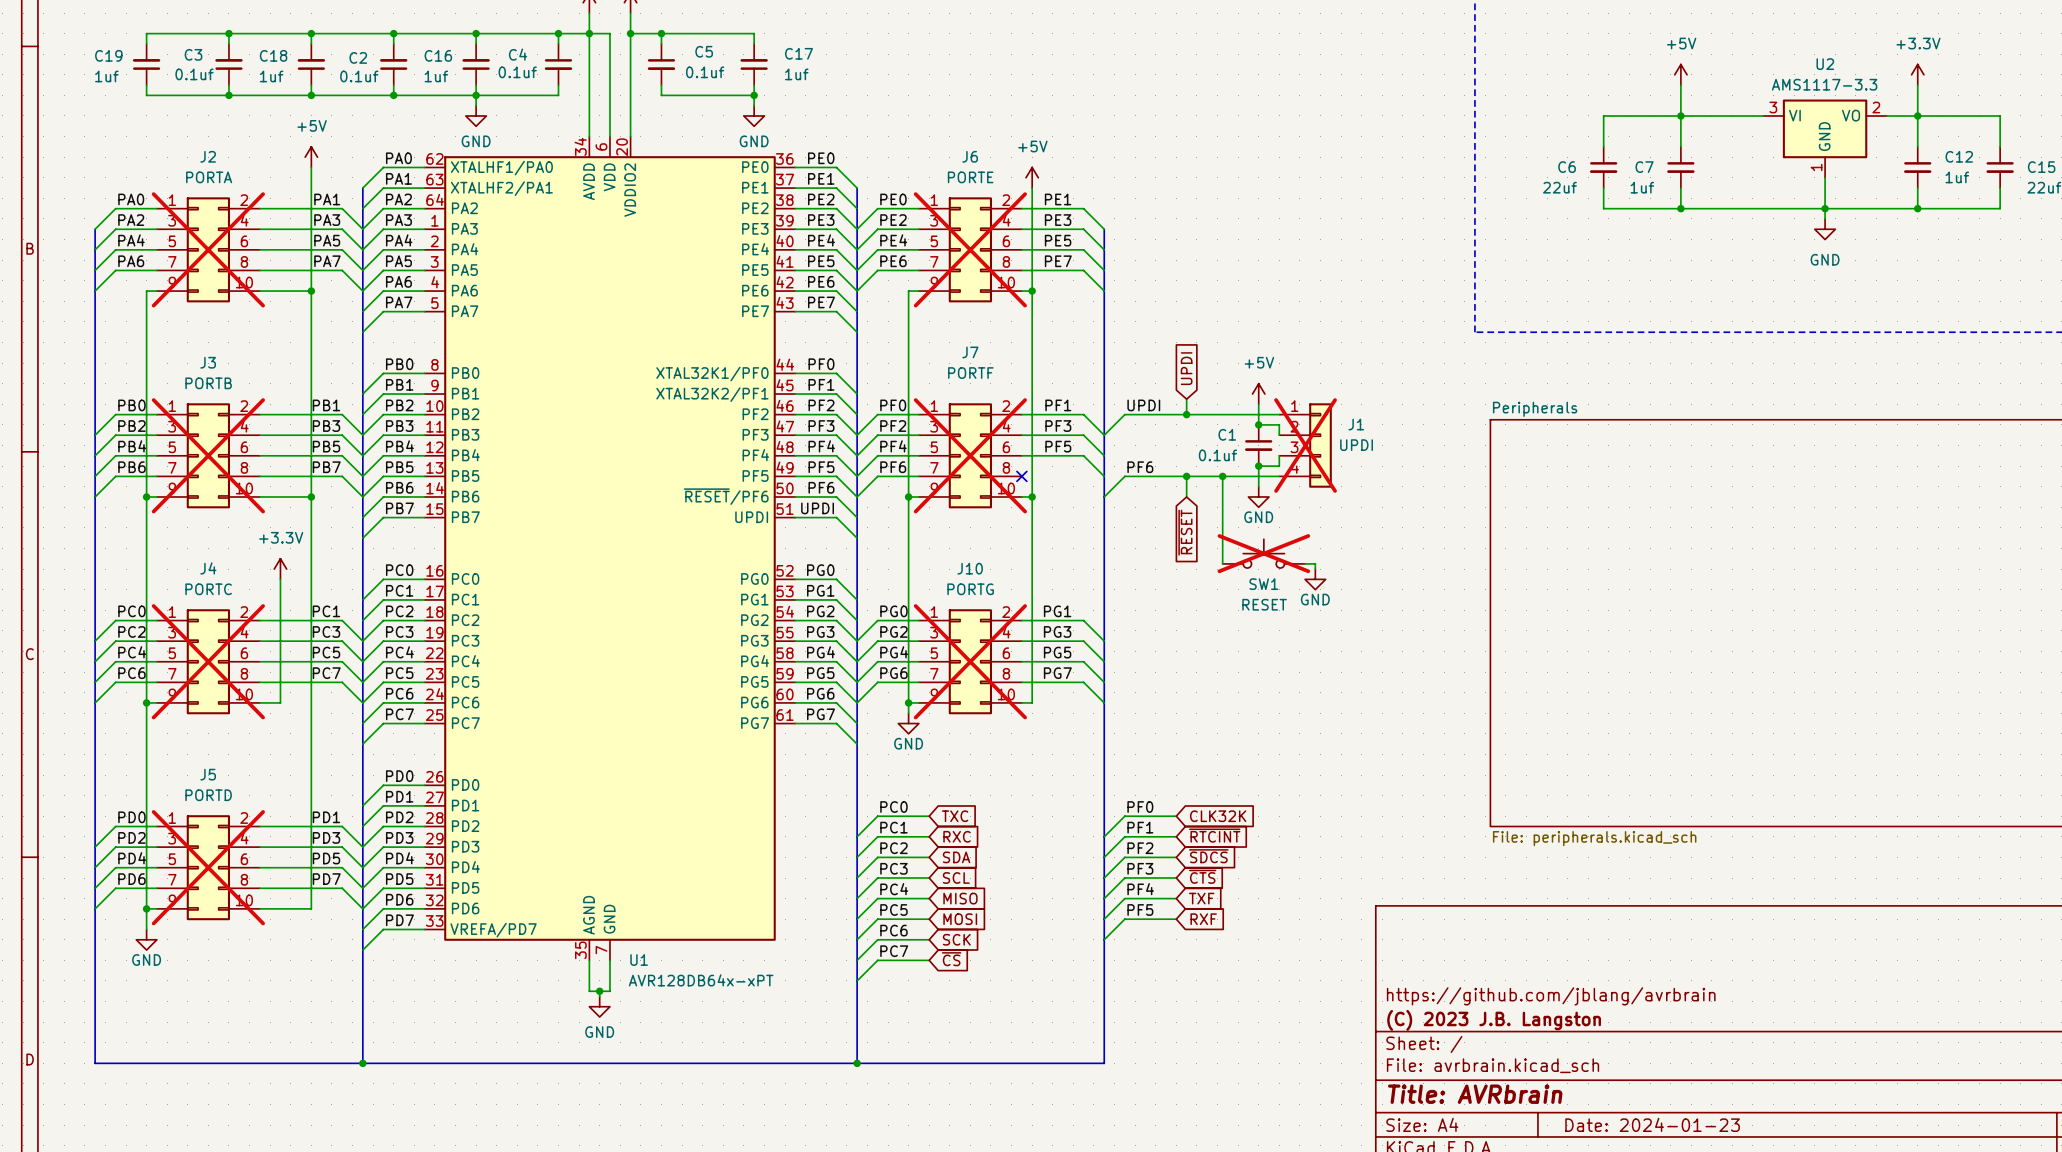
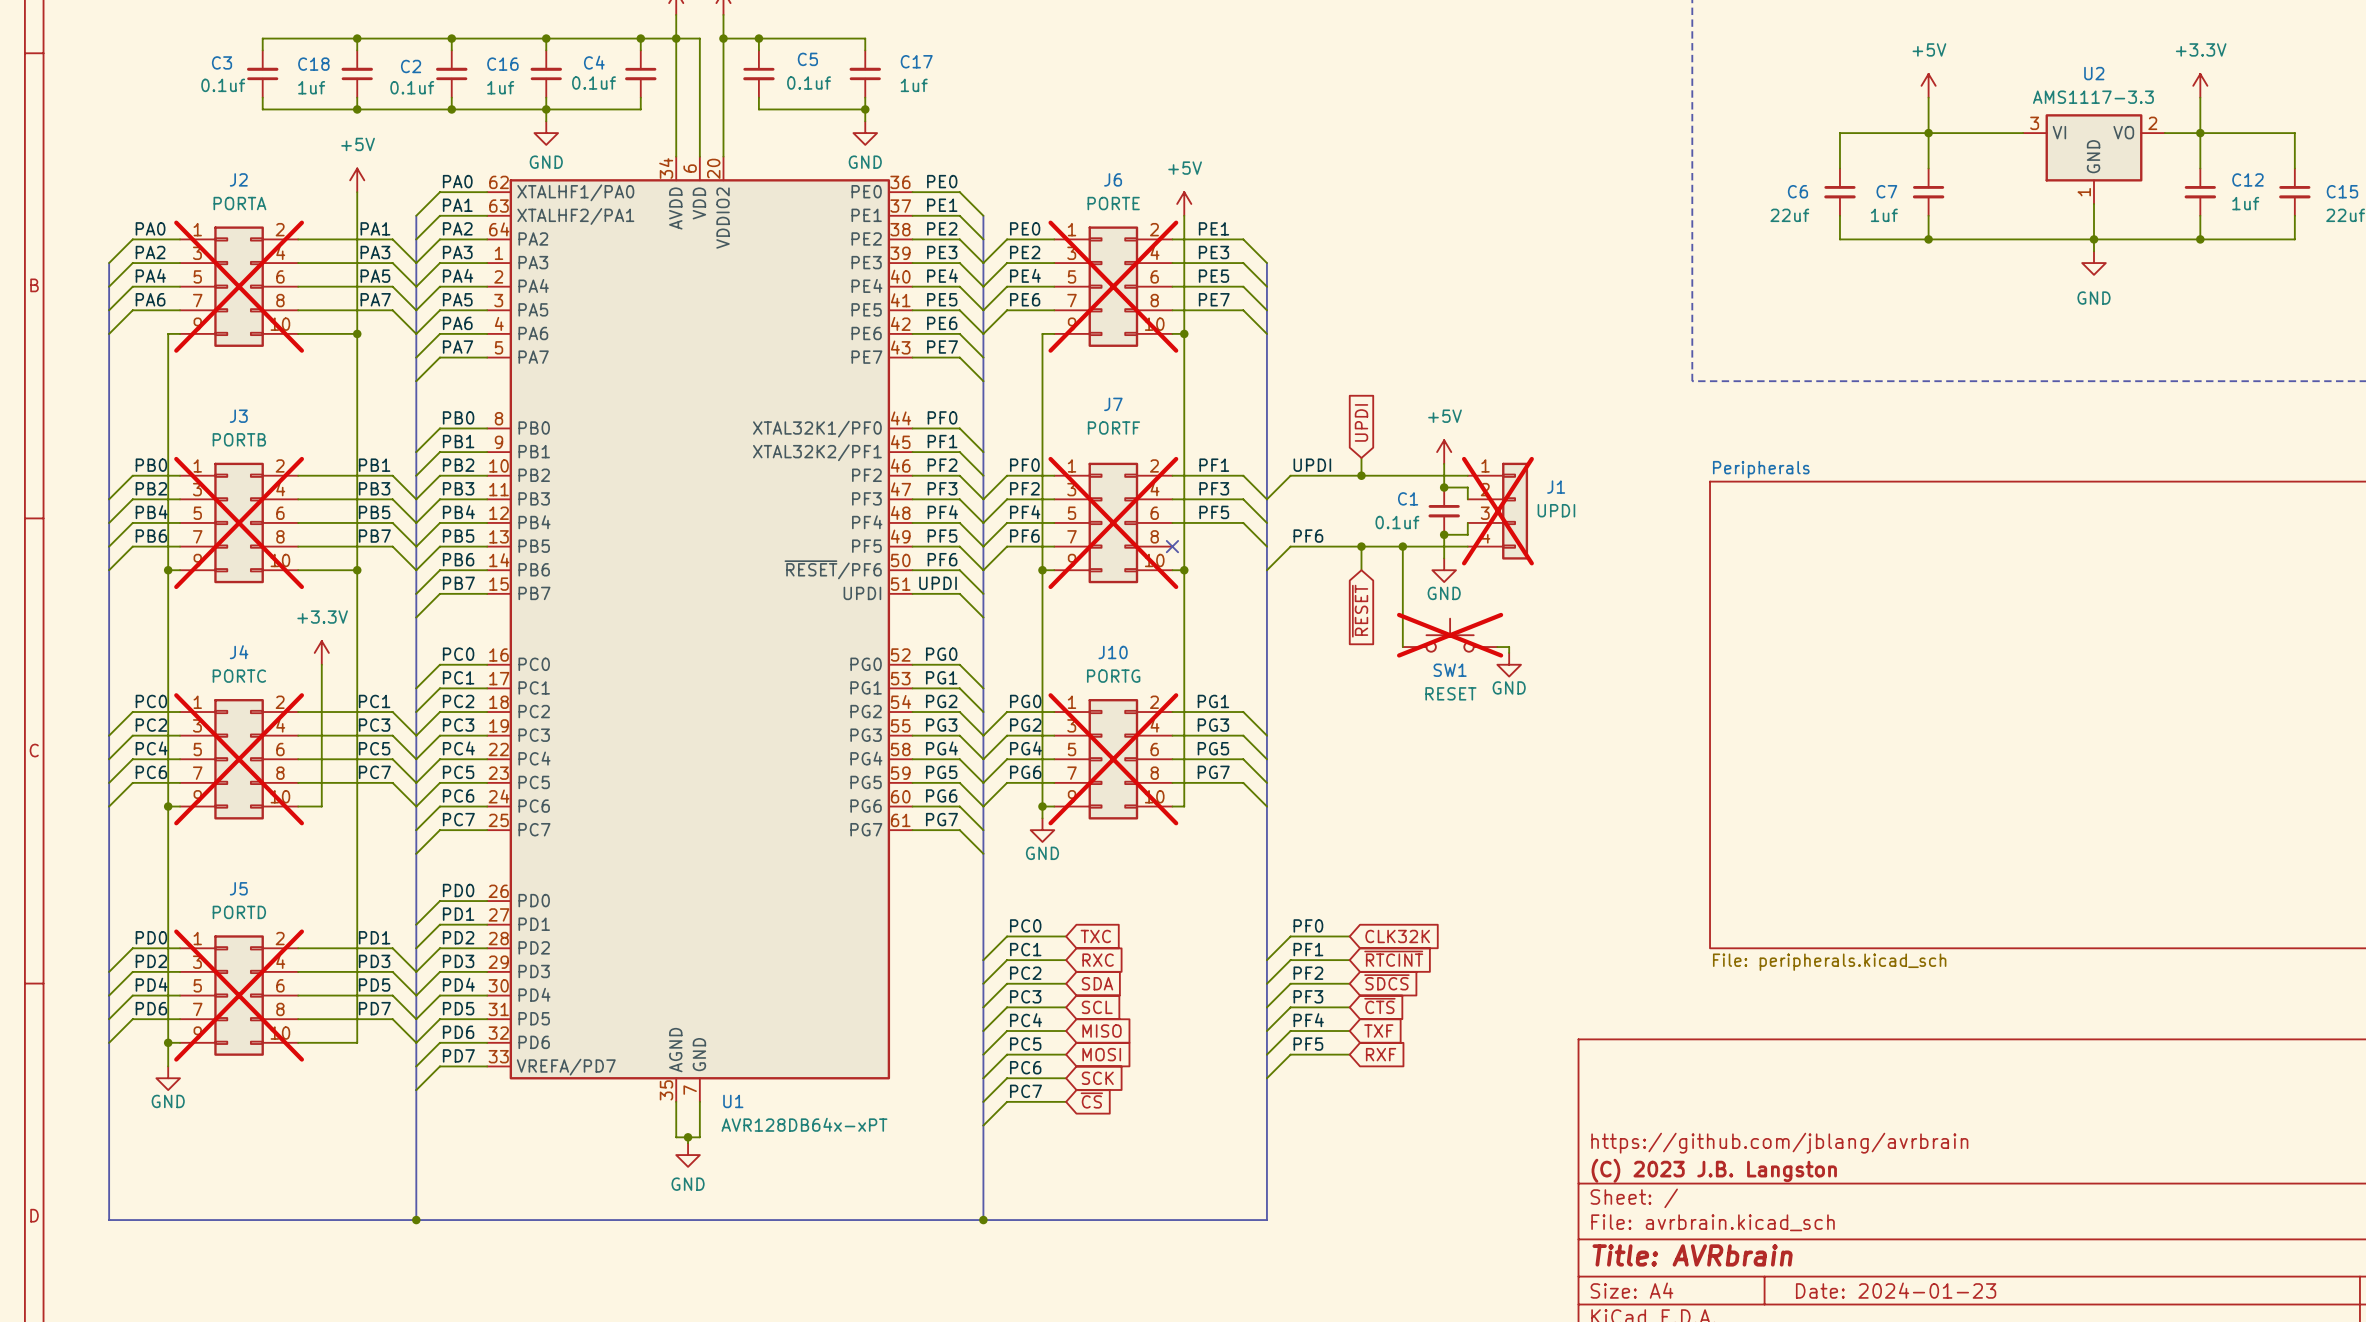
wire: (228, 33) (146, 33) (146, 43) -> none
junction: (228, 33) -> none
C19: 1uf (146, 64) -> none
wire: (146, 85) (146, 95) (228, 95) -> none
junction: (228, 95) -> none

